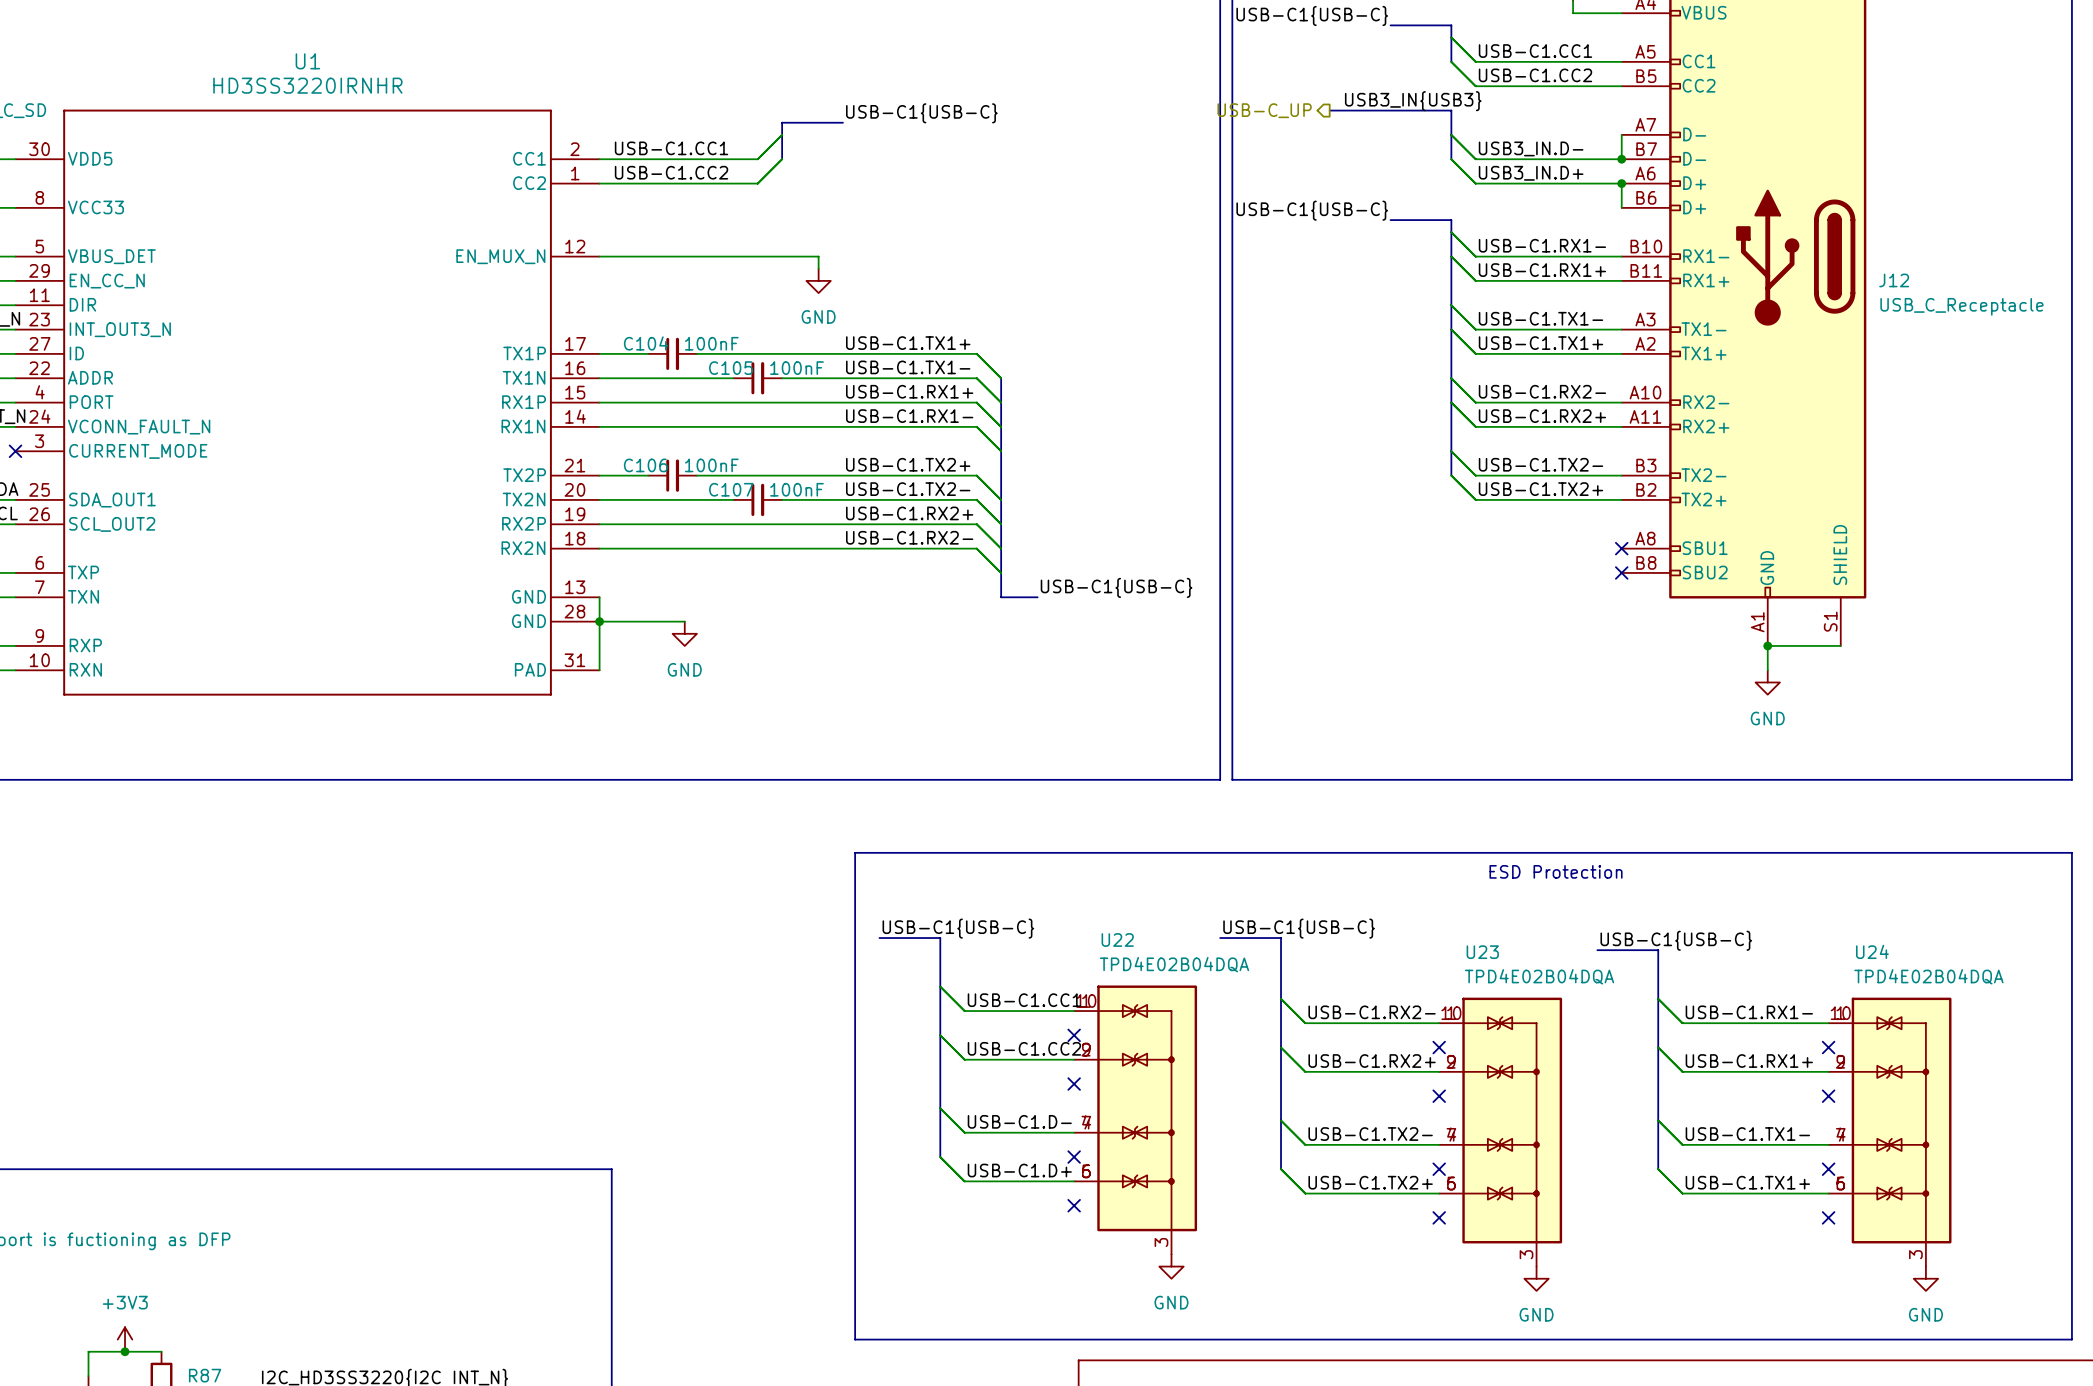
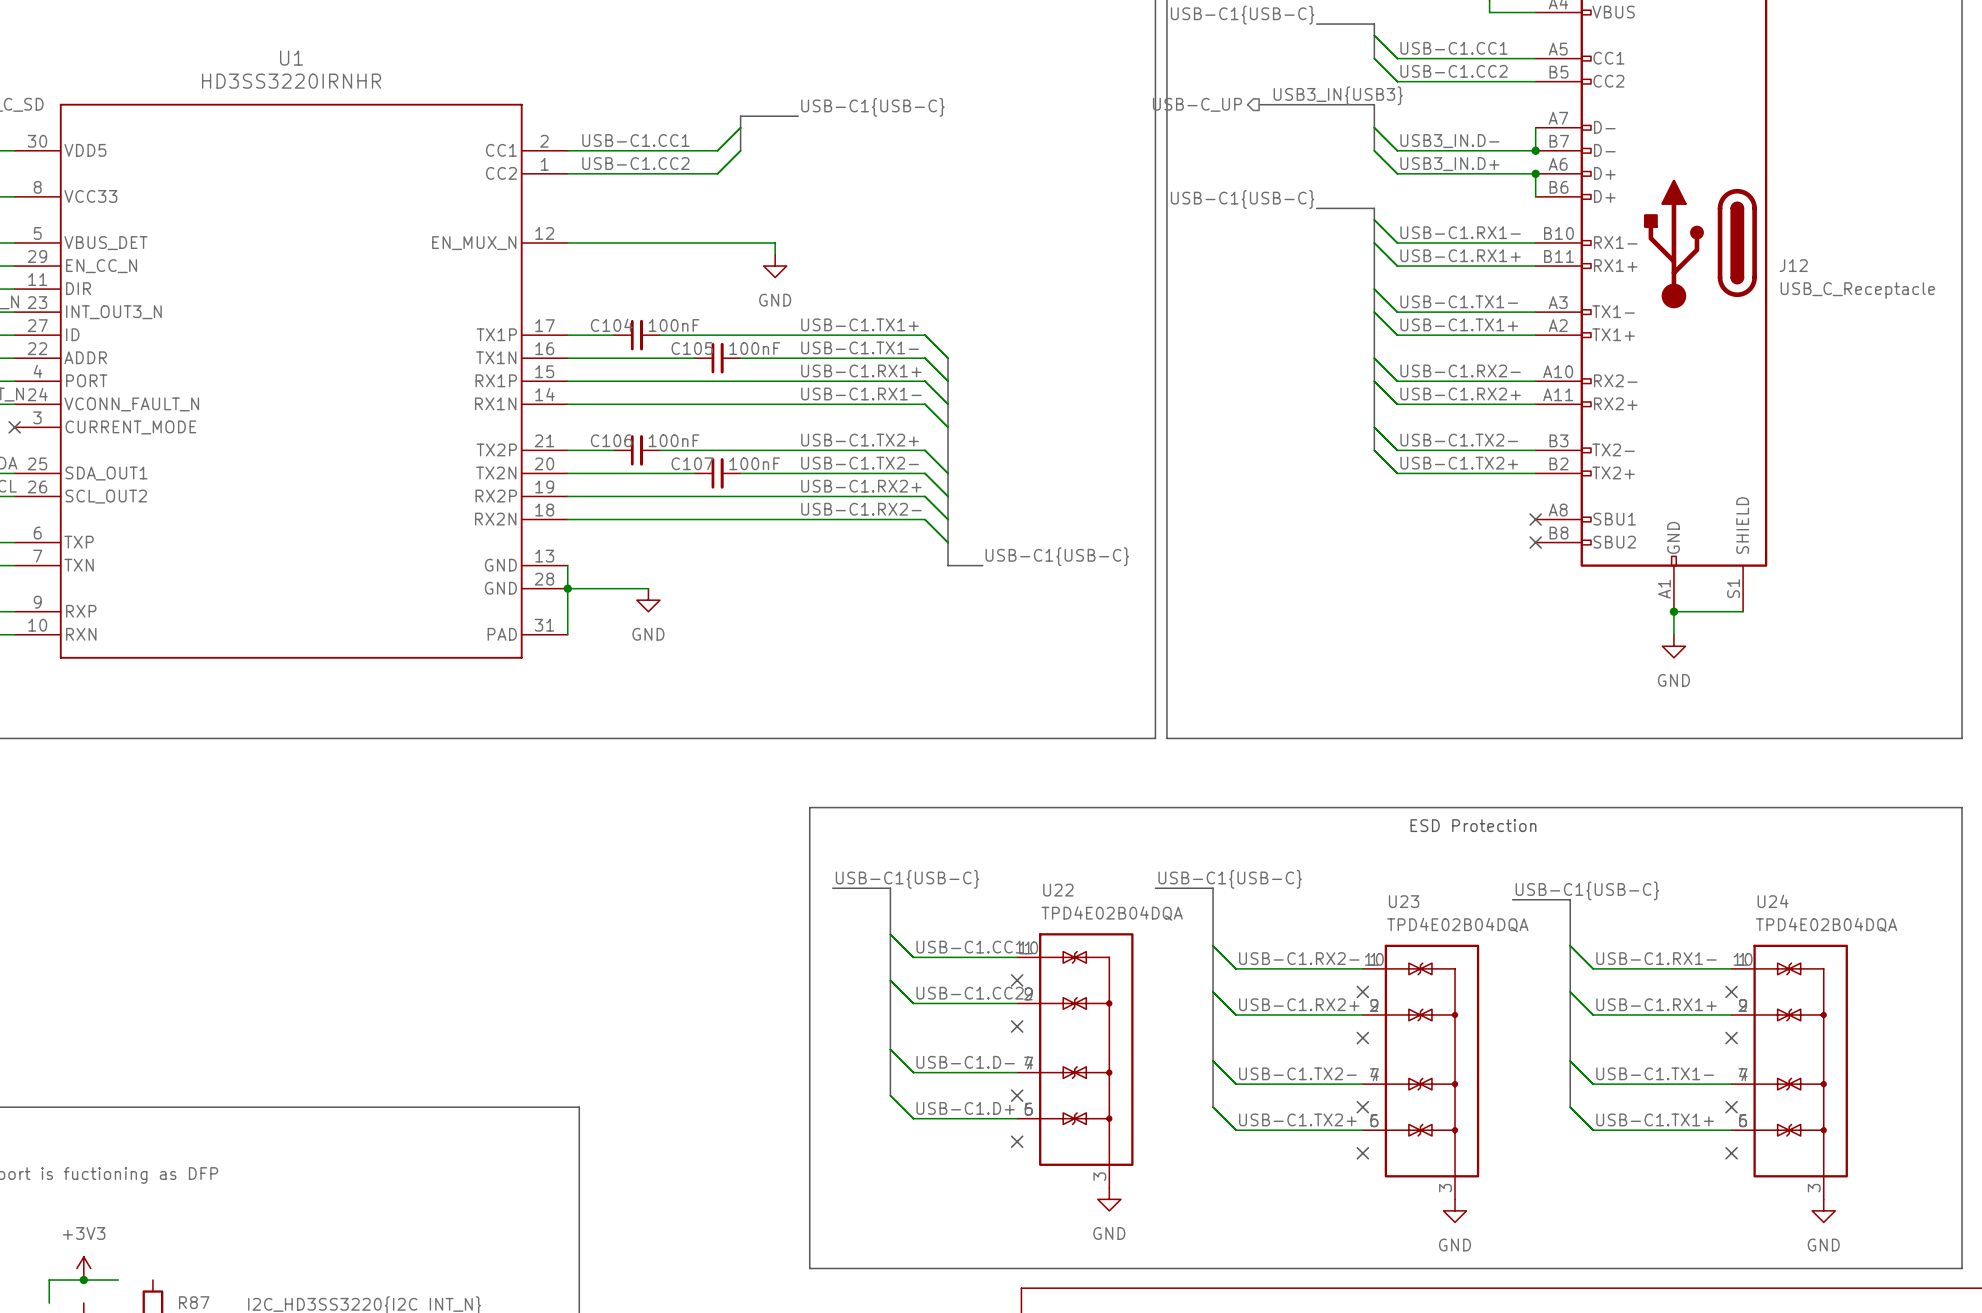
power symbol position: +3V3 (125, 1339) -> +3V3 (83, 1268)
wire: (88, 1351) (88, 1376) -> (83, 1280) (49, 1280) (49, 1303)
junction: none -> (83, 1280)
wire: (125, 1351) (161, 1351) -> none
junction: (125, 1351) -> none

